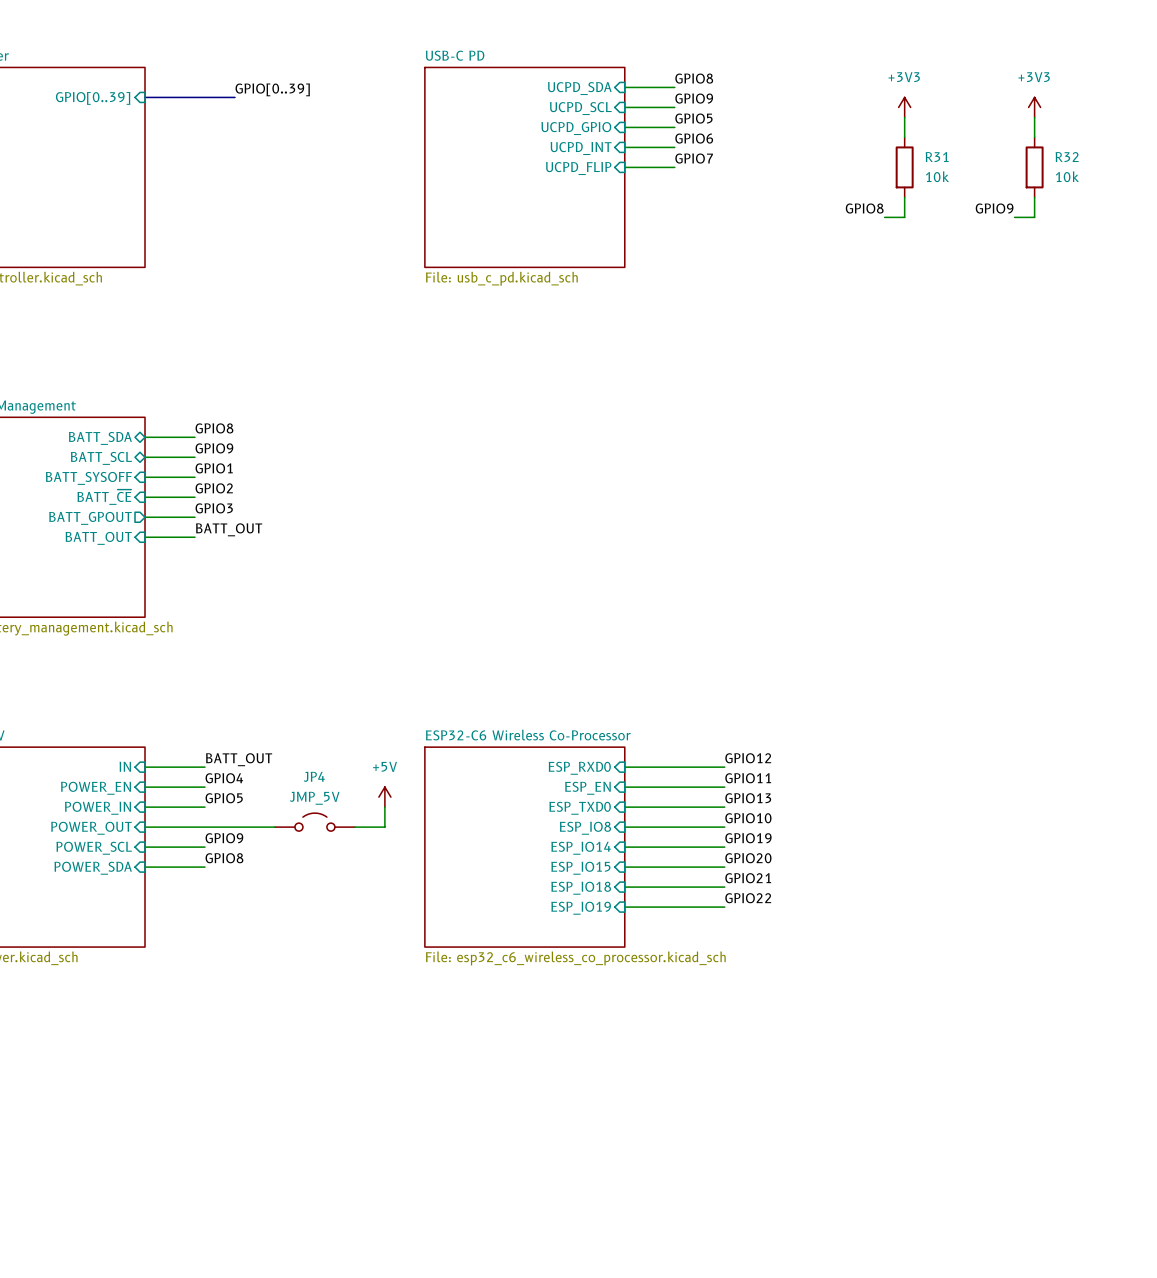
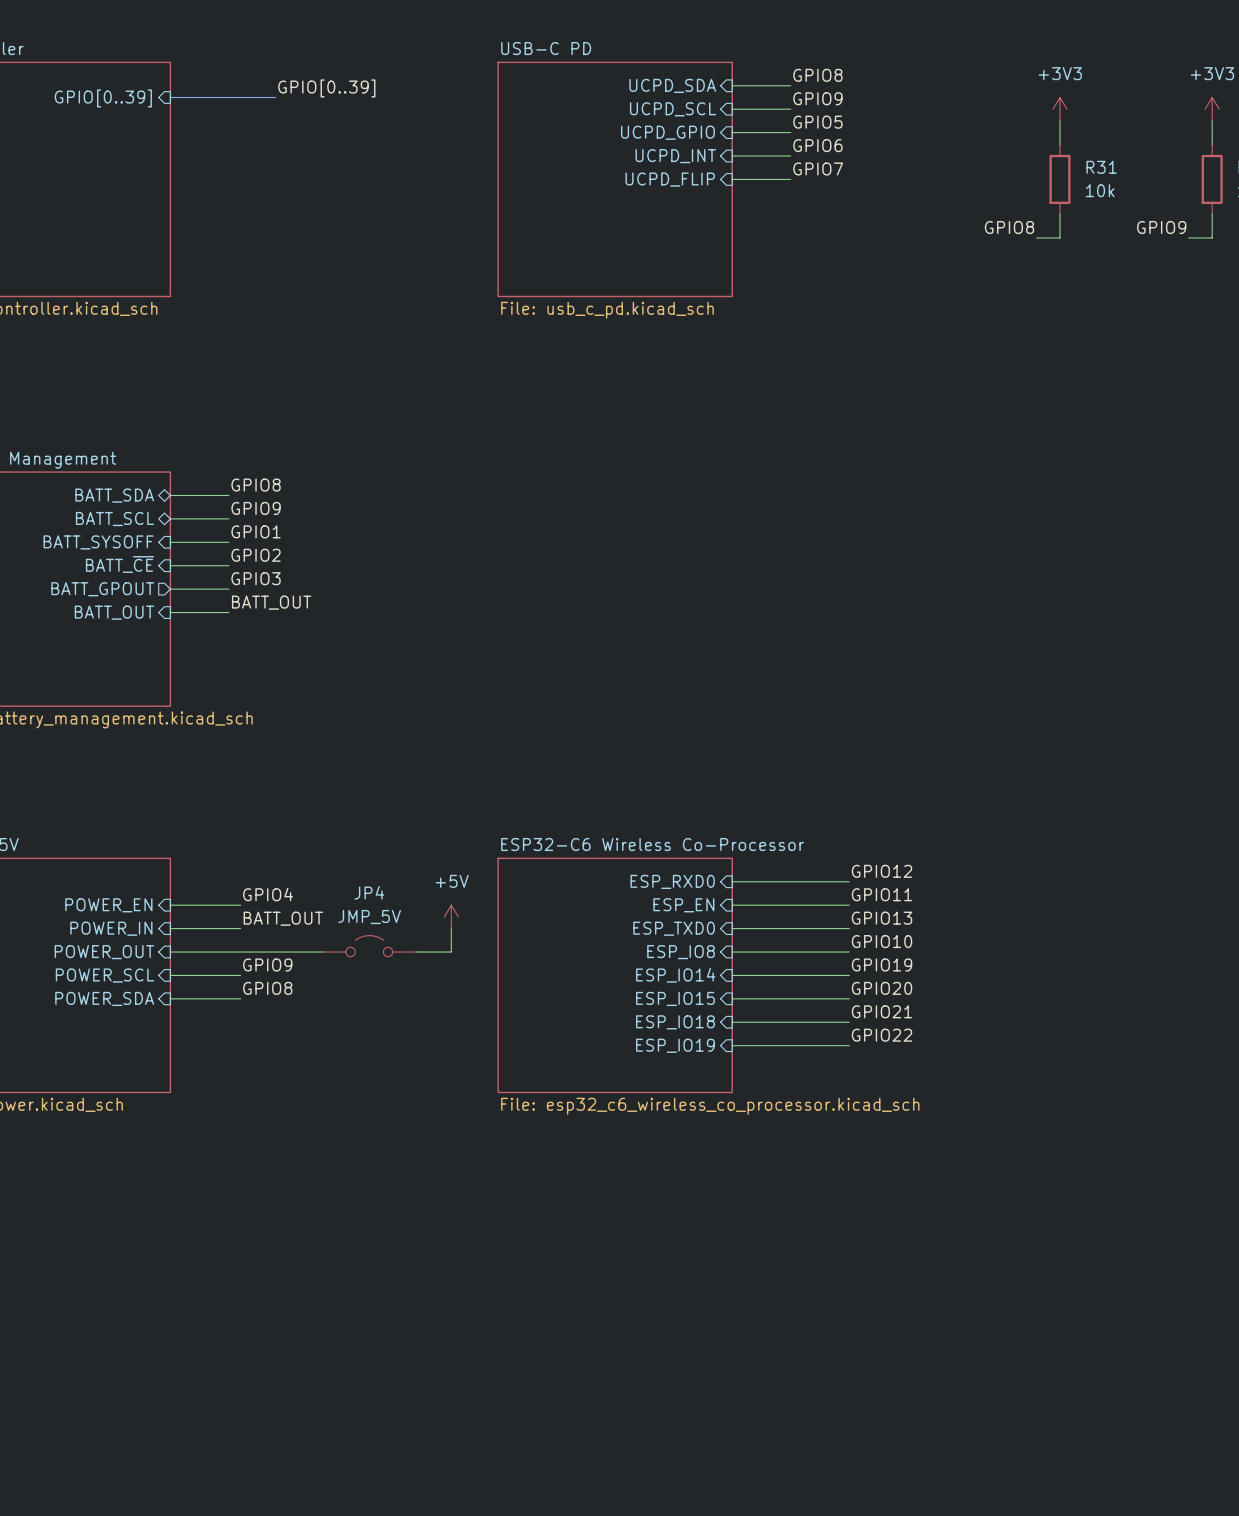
label: BATT_OUT (239, 759) -> none
sheet pin: IN (125, 766) -> none
wire: (145, 767) (204, 767) -> none
label: GPIO5 (224, 798) -> BATT_OUT (283, 918)

